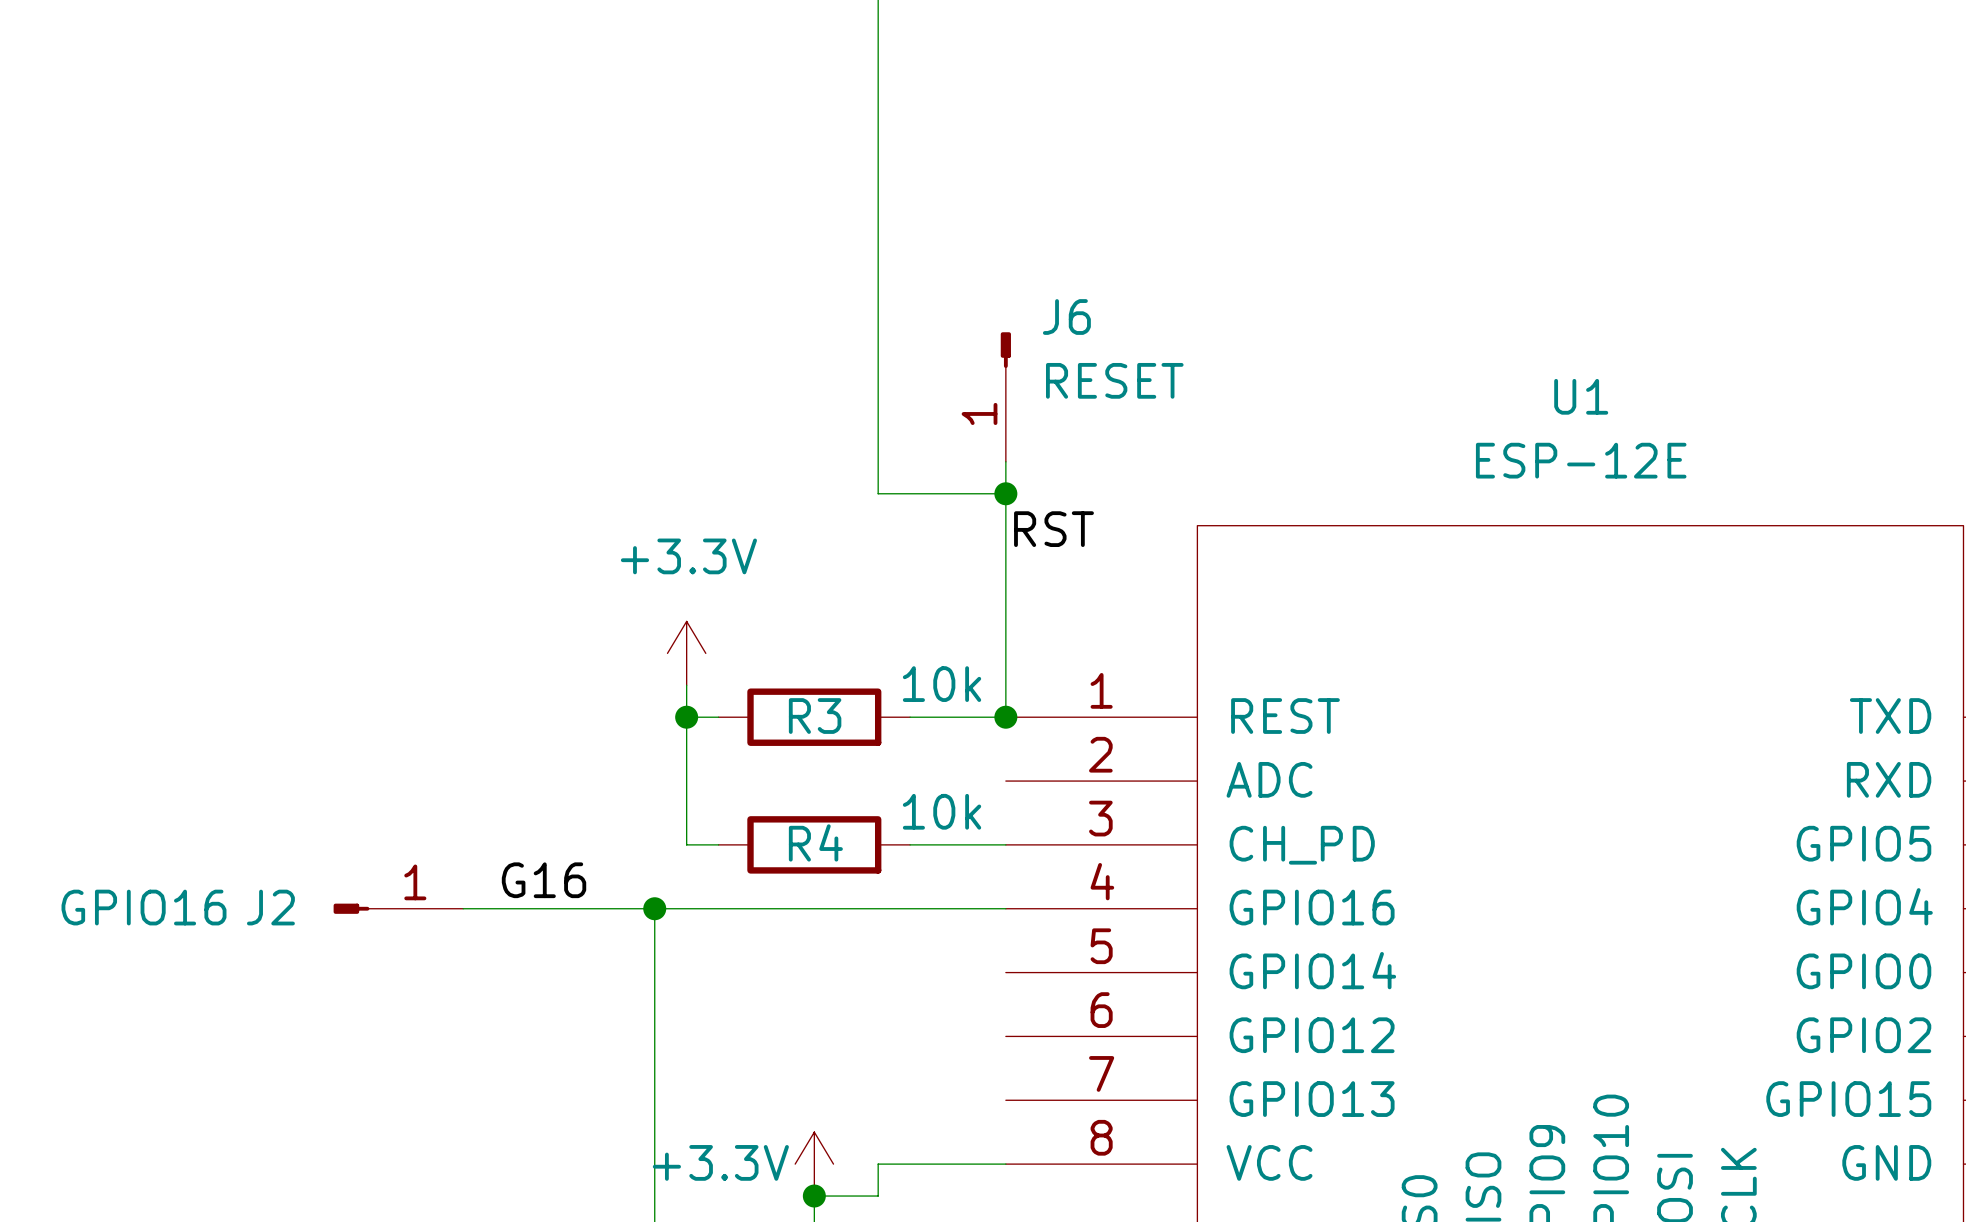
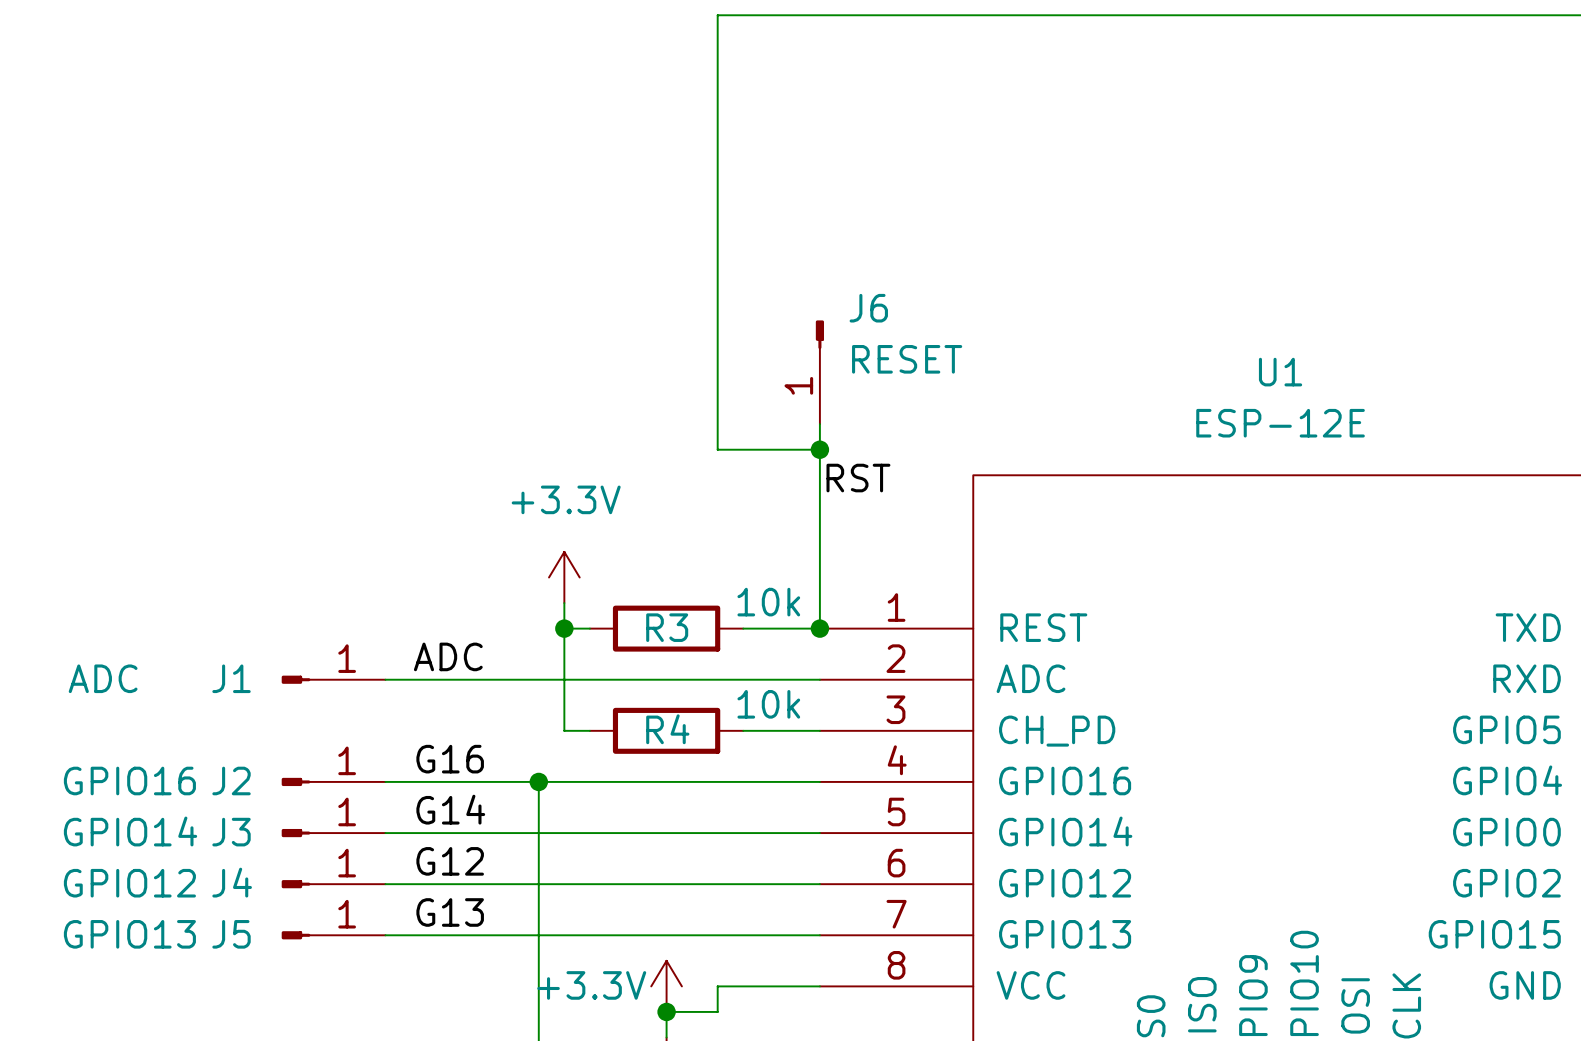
label: none -> ADC (448, 656)
J1: none -> ADC (333, 679)
wire: none -> (385, 679) (819, 679)
label: none -> G14 (450, 809)
J3: none -> GPIO14 (333, 833)
wire: none -> (385, 833) (819, 833)
label: none -> G12 (450, 861)
J4: none -> GPIO12 (333, 884)
wire: none -> (385, 884) (819, 884)
label: none -> G13 (450, 912)
J5: none -> GPIO13 (333, 935)
wire: none -> (385, 935) (819, 935)

